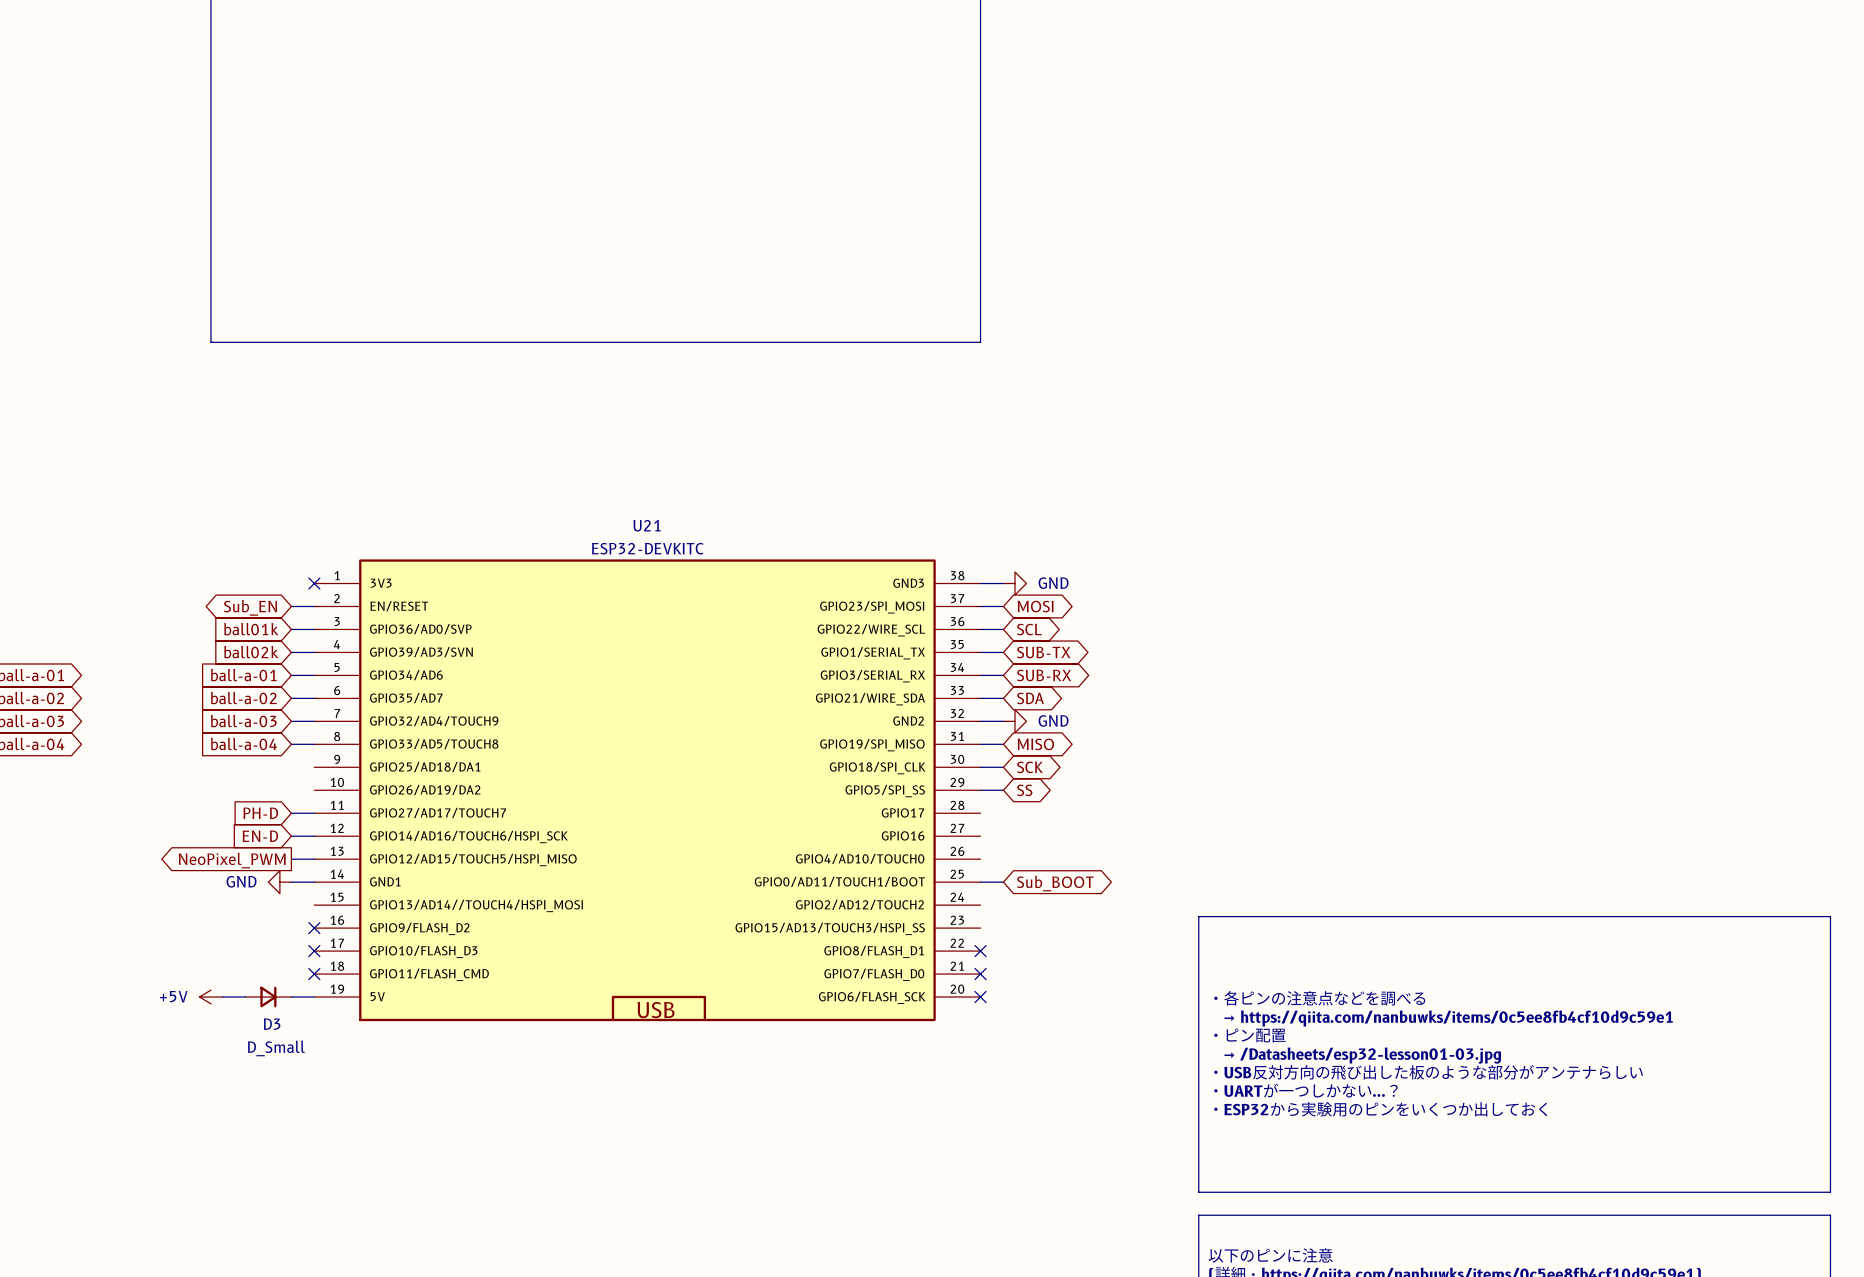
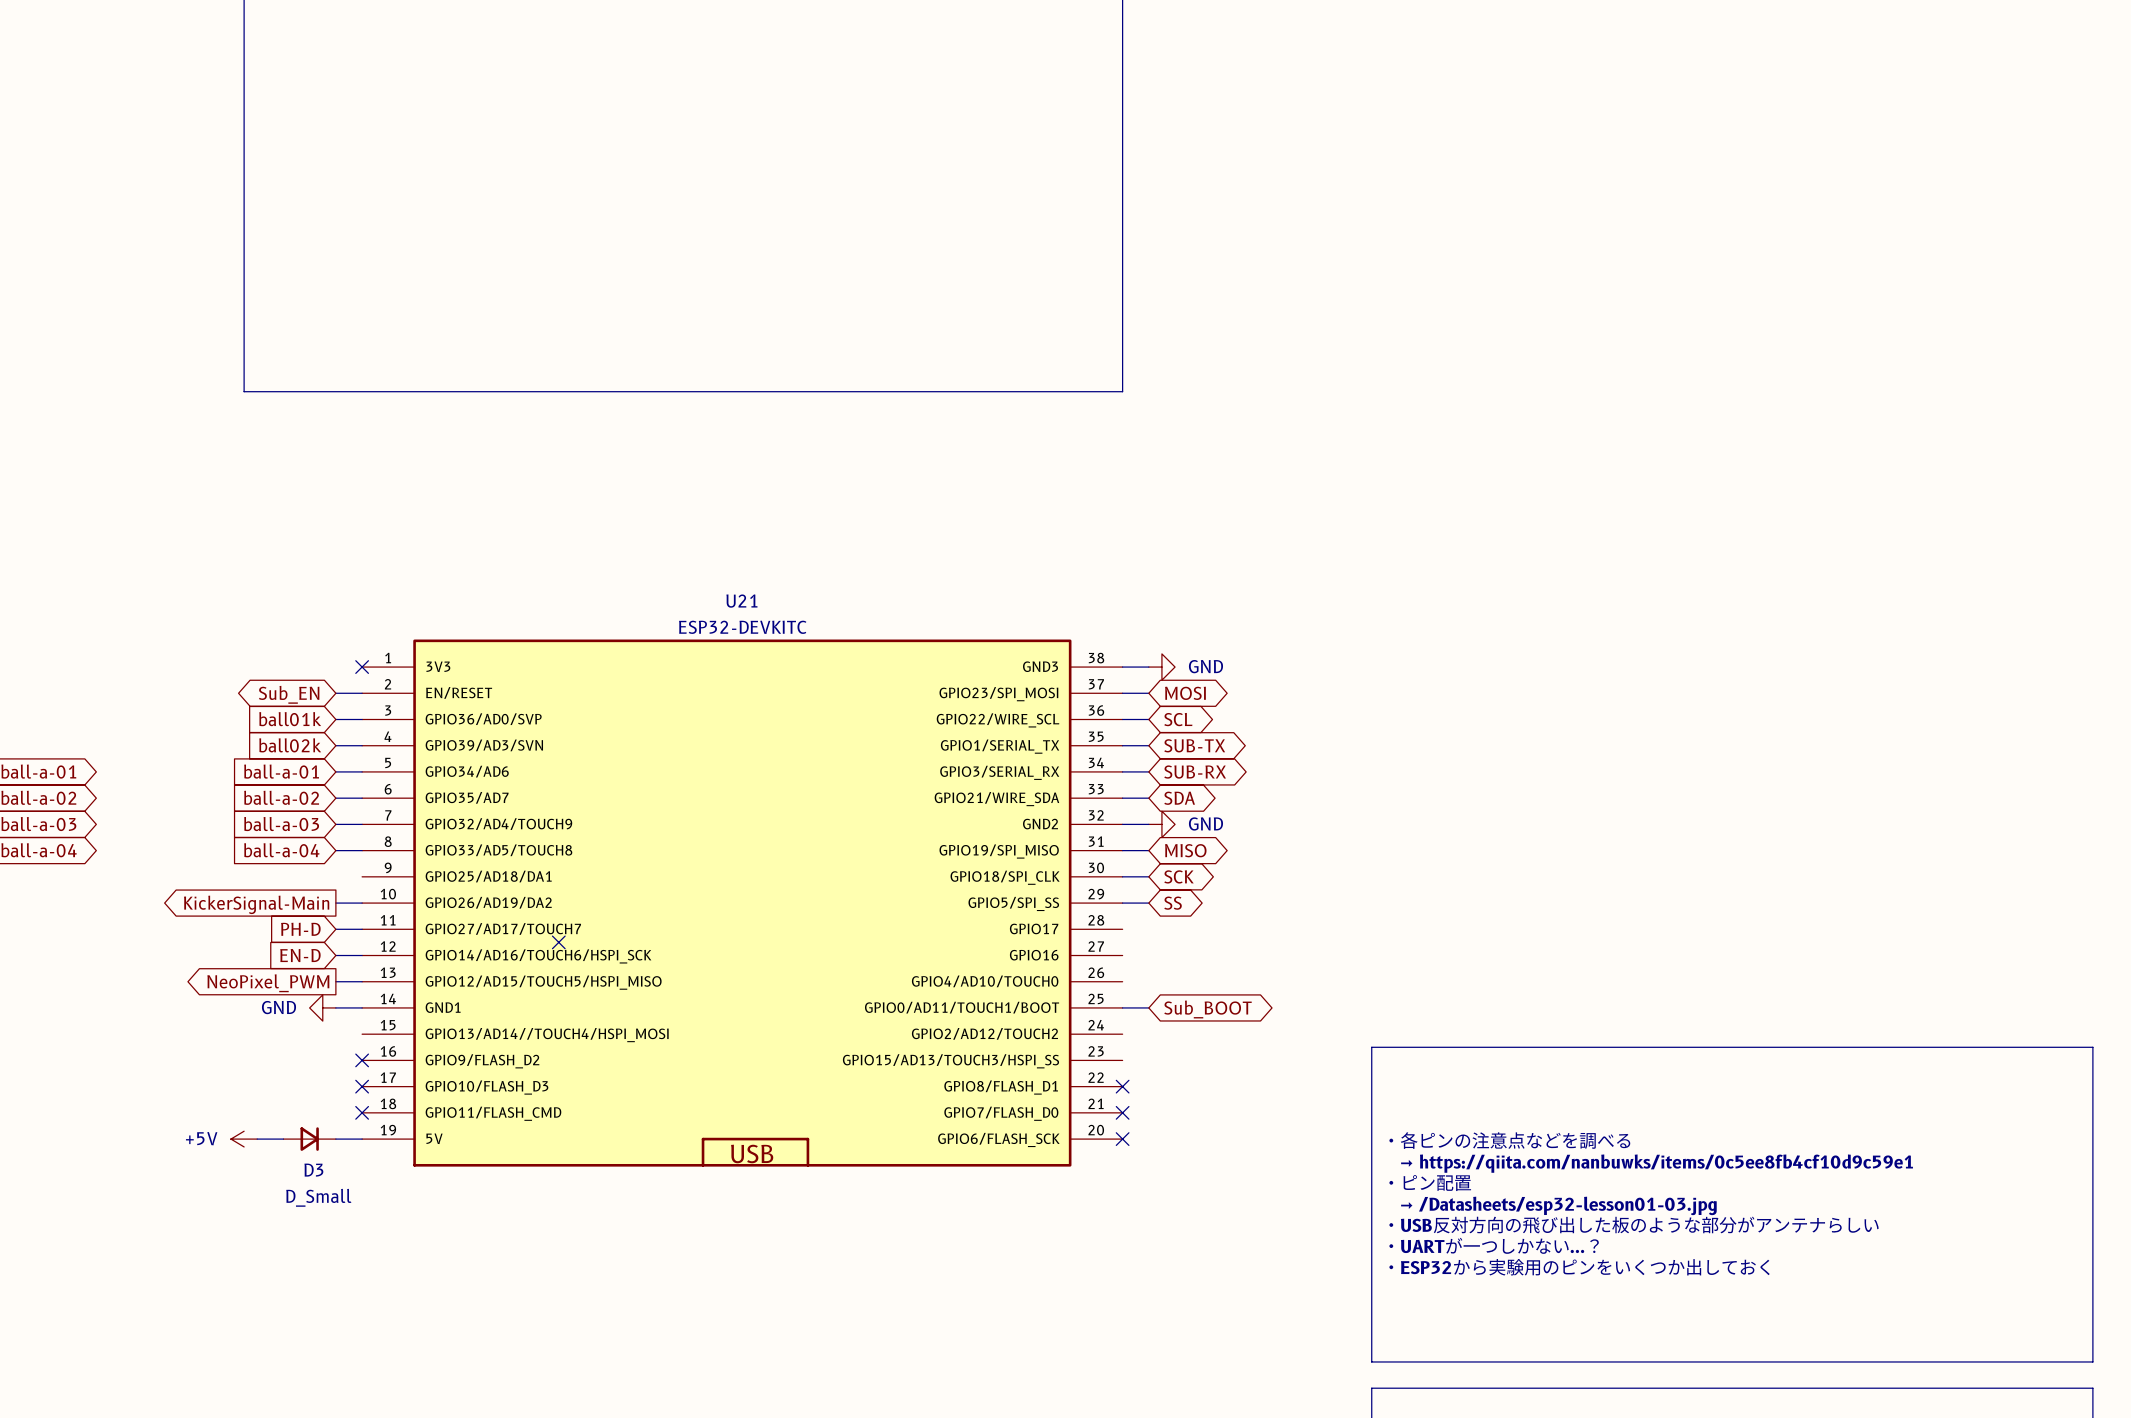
wire: none -> (335, 903) (362, 903)
global label: none -> KickerSignal-Main (256, 904)
no-connect mark: none -> (558, 942)

